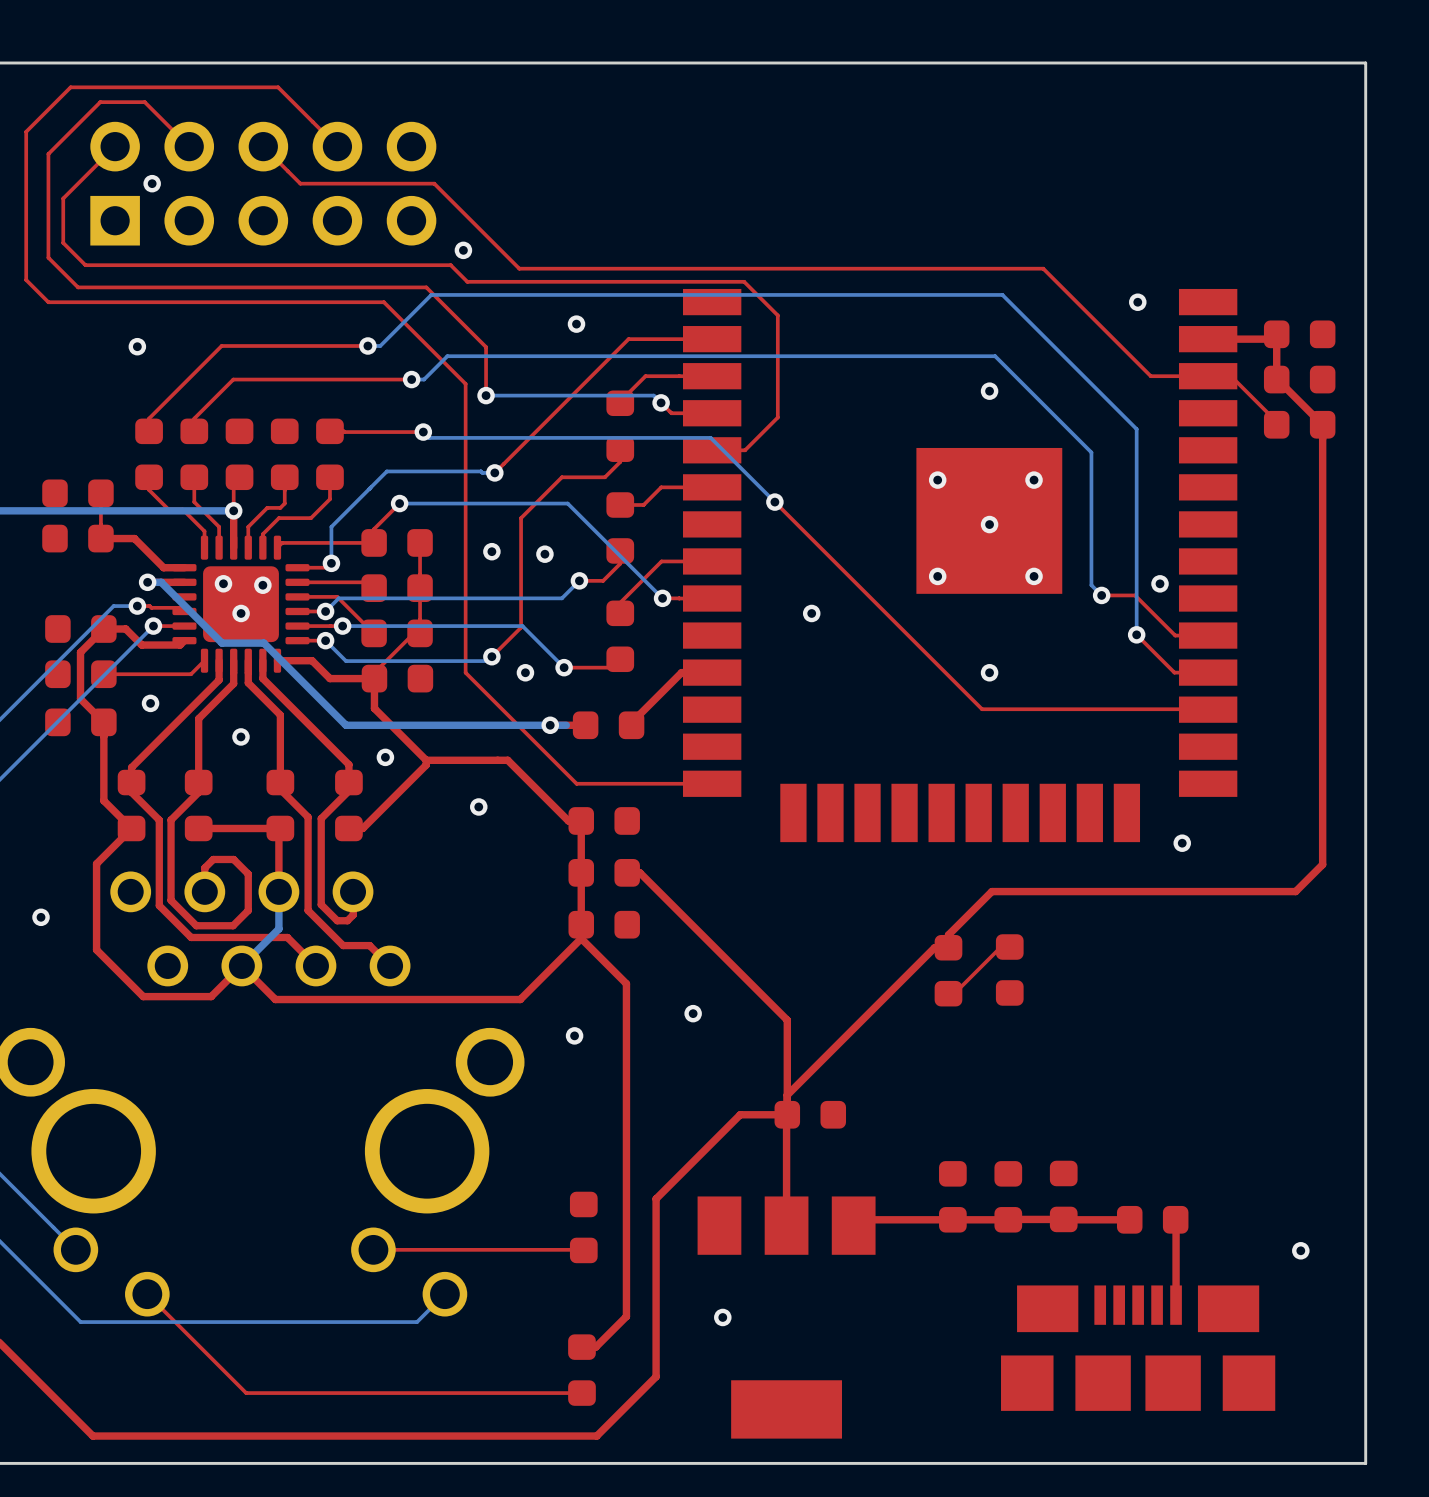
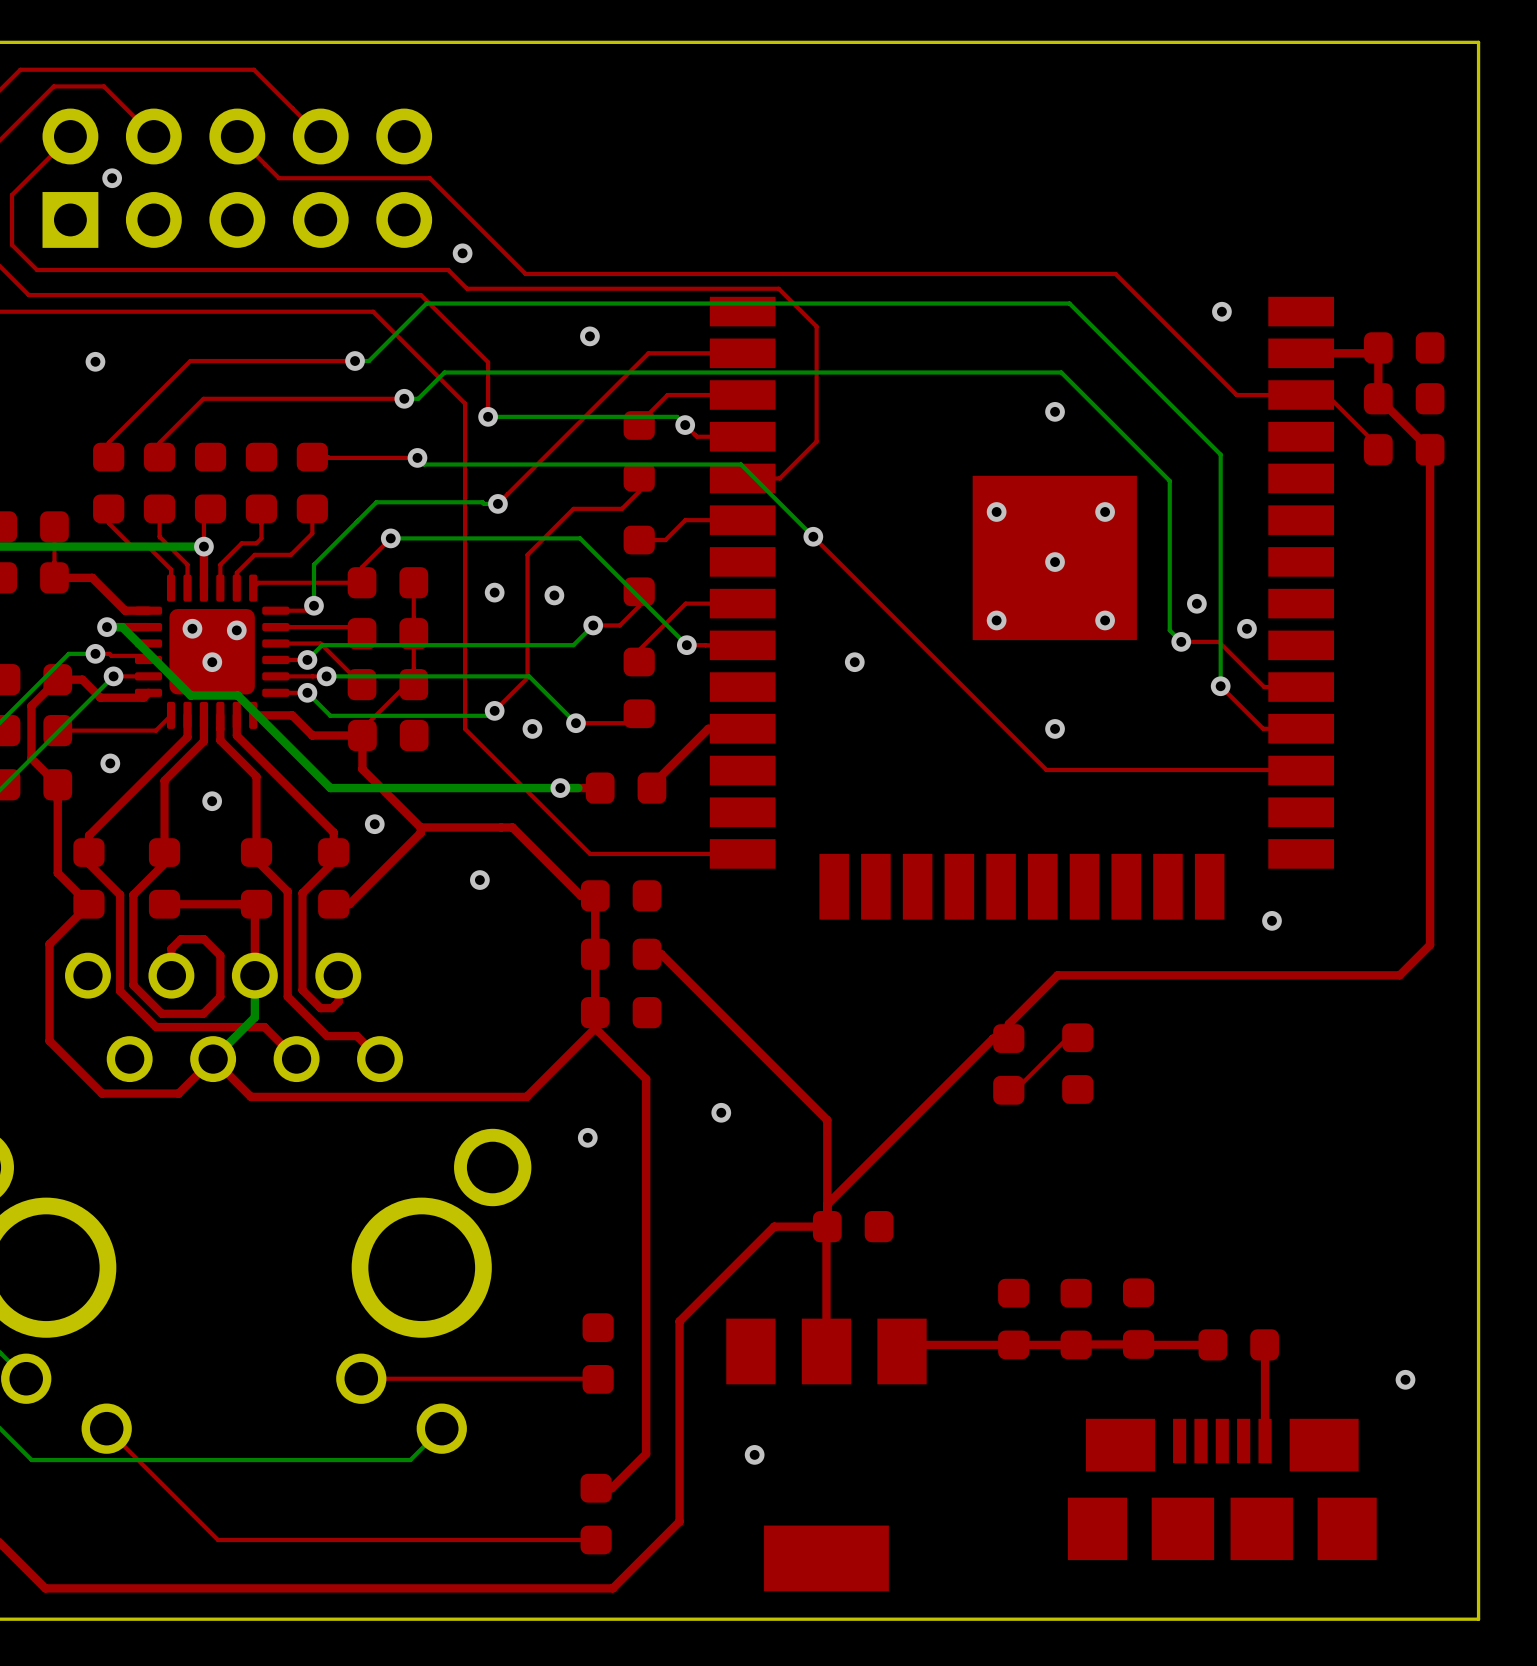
via: none -> (1196, 603)

